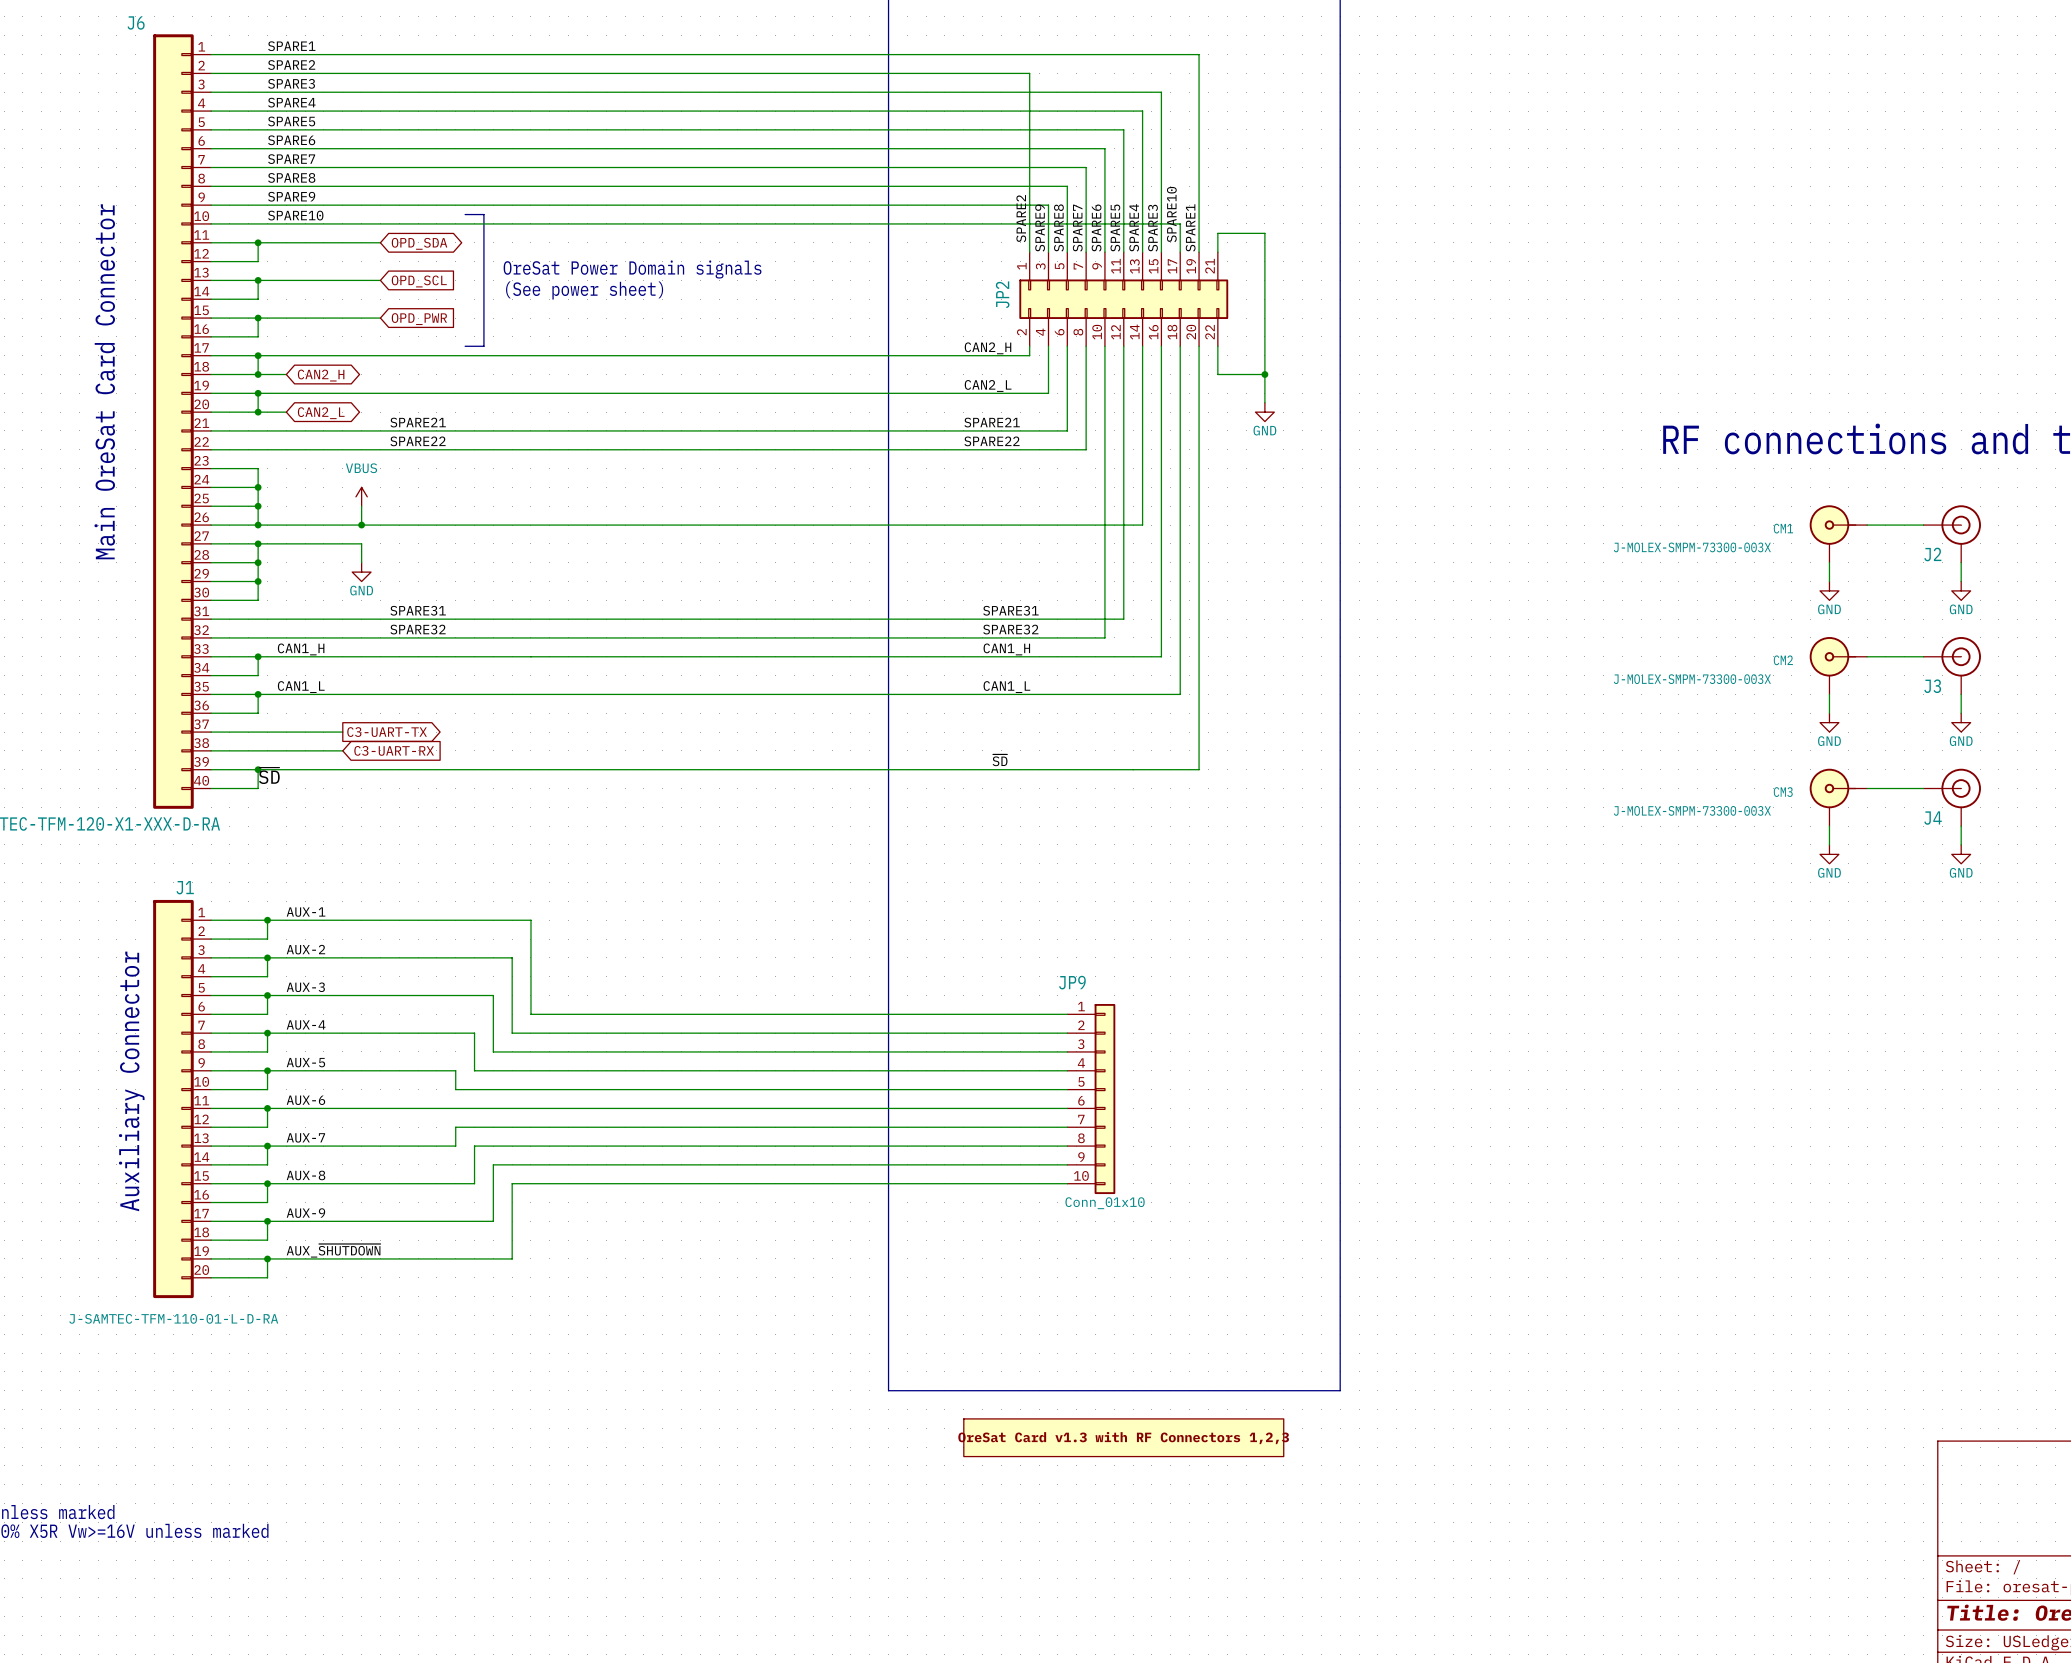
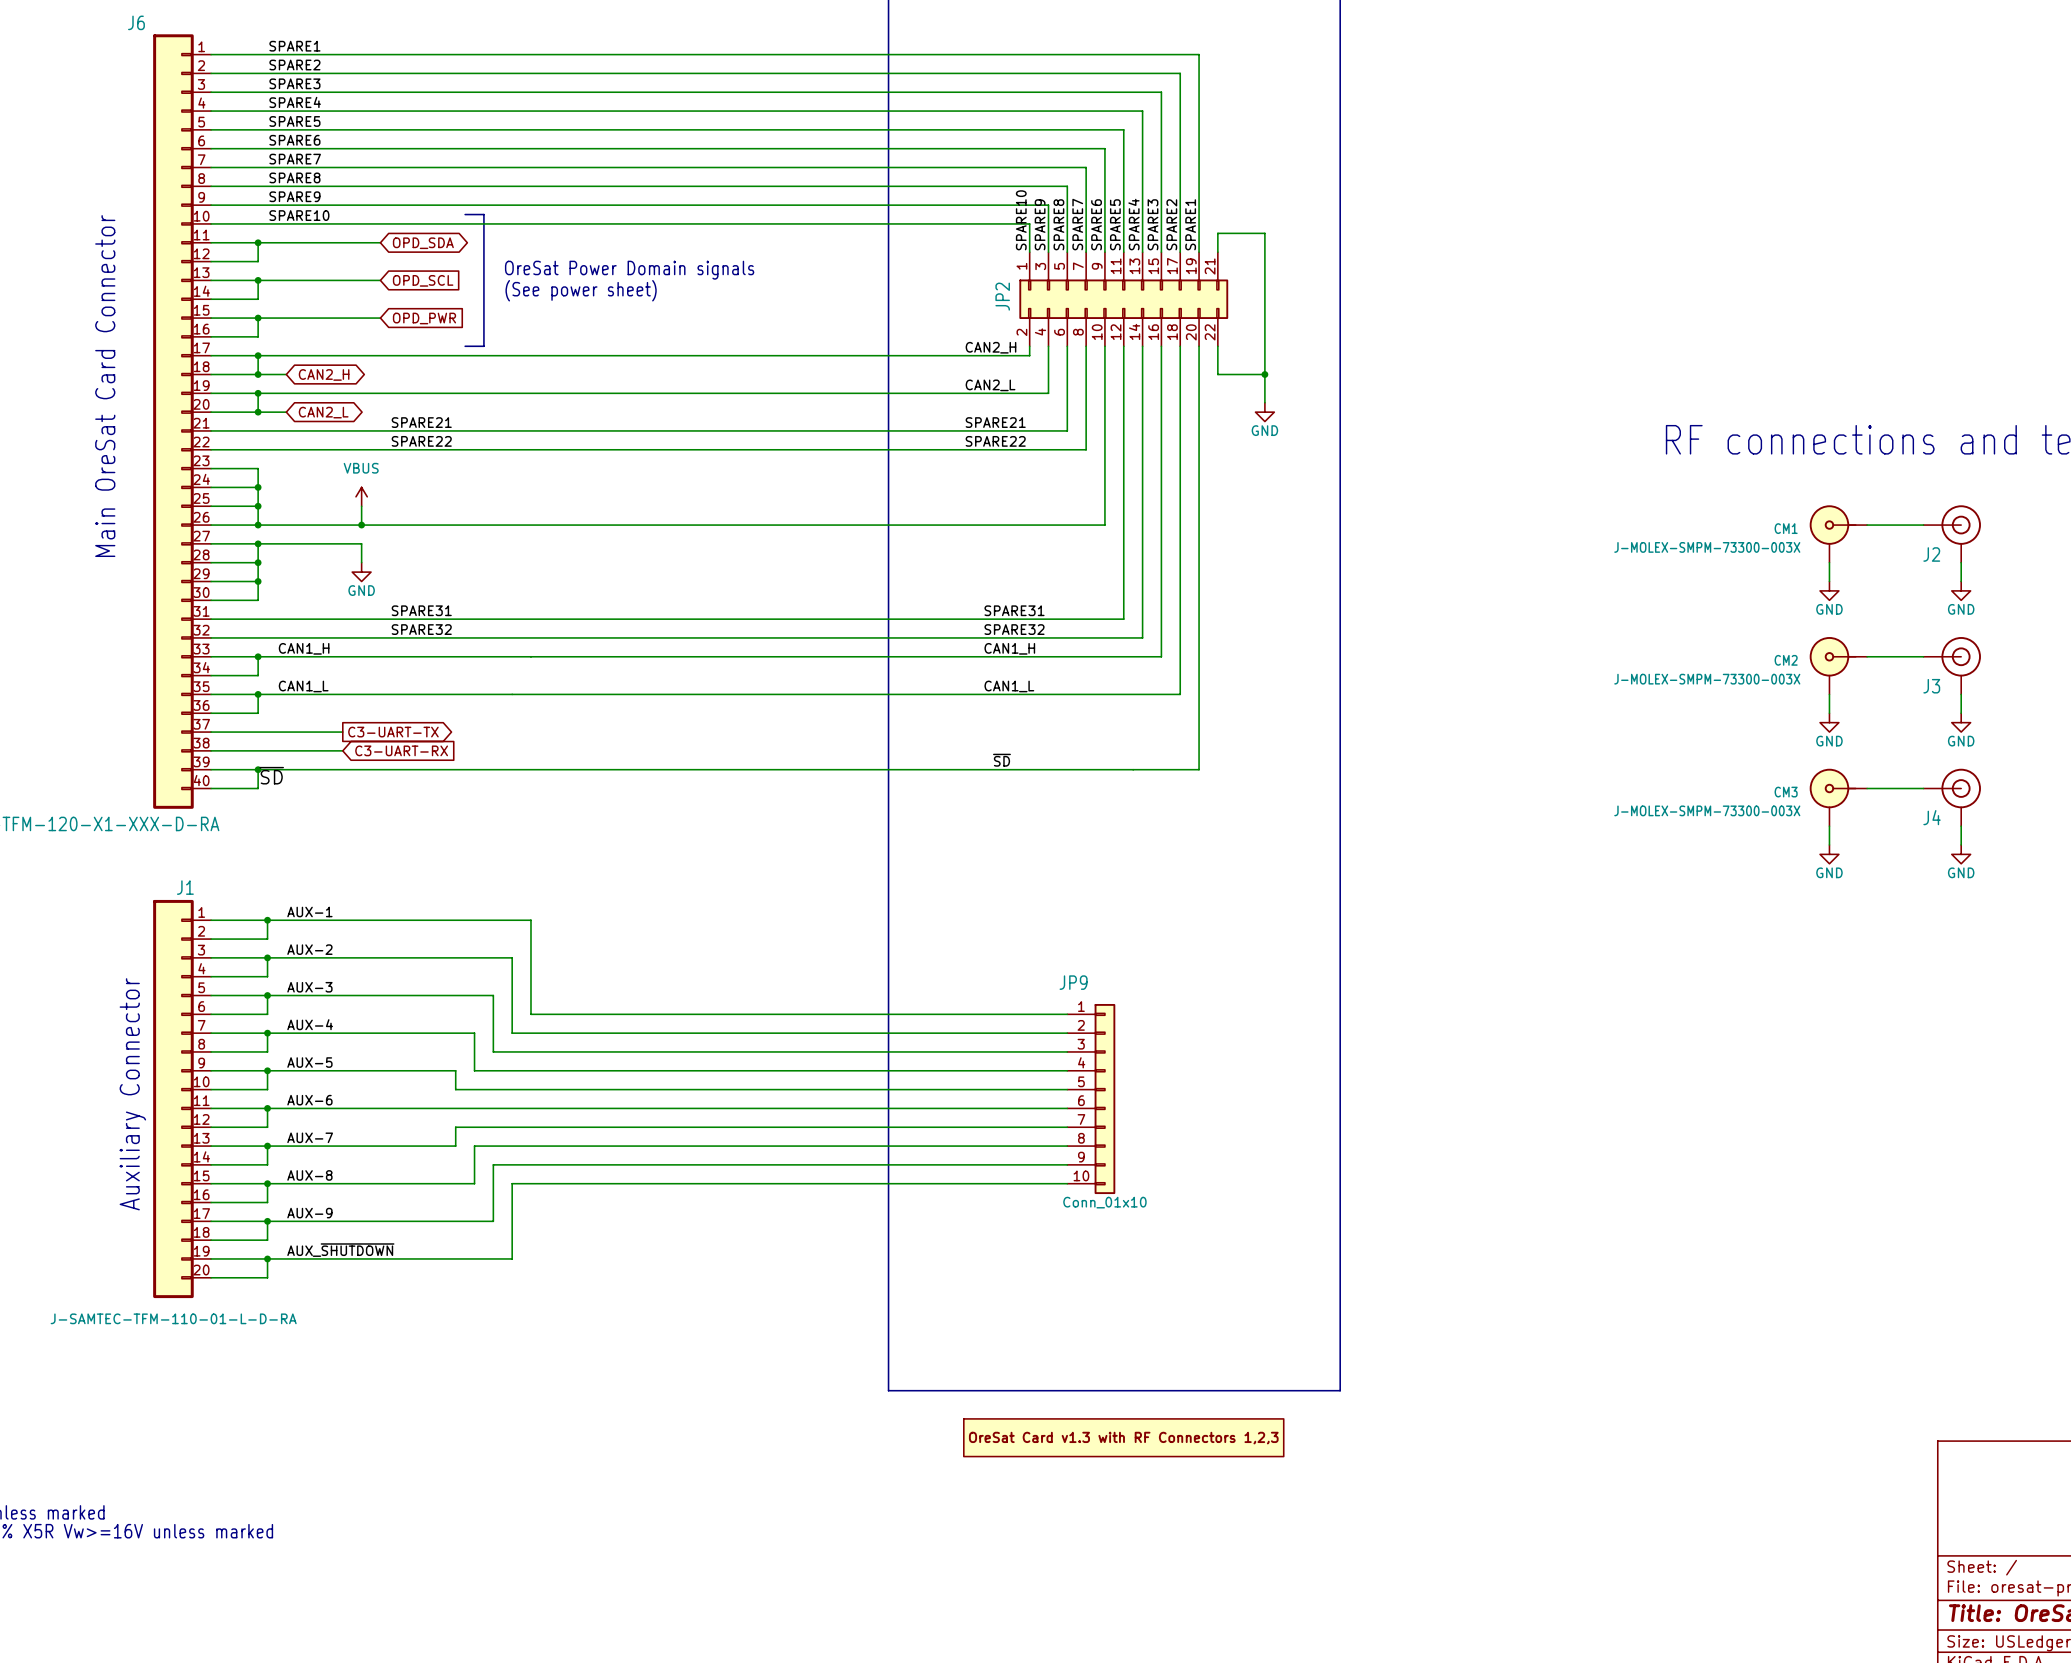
wire: (1029, 73) (1029, 223) (1180, 223) -> (1029, 73) (1180, 73) (1180, 223)
label position: SPARE10 (1171, 214) -> SPARE10 (1021, 220)
label position: SPARE2 (1021, 218) -> SPARE2 (1171, 224)
wire: (1142, 525) (1104, 525) (1104, 637) -> (1142, 525) (1142, 637) (1104, 637)

